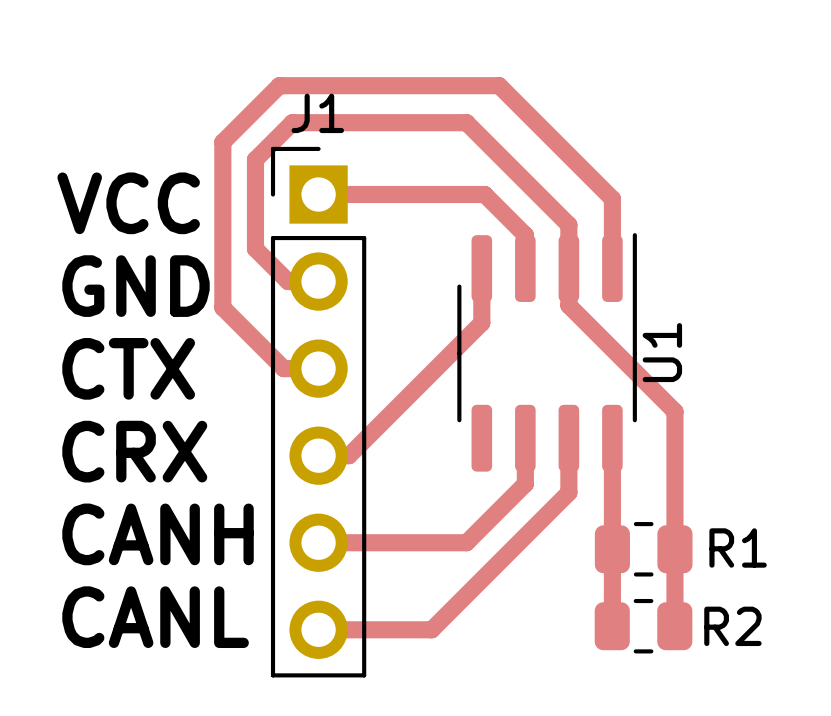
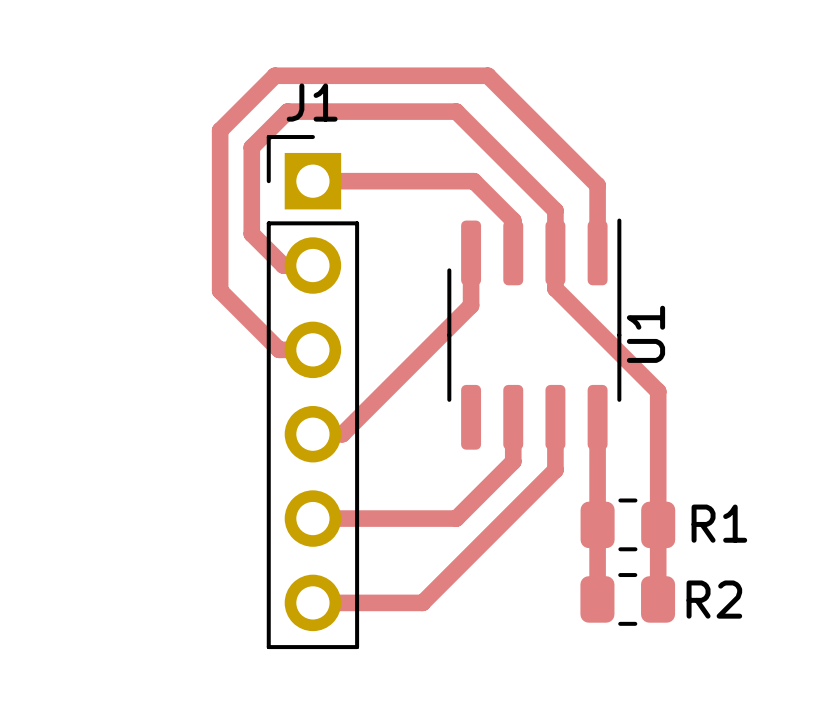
text: VCC (128, 203) -> none
text: GND (136, 286) -> none
text: CTX (128, 368) -> none
text: CRX (134, 451) -> none
text: CANH (158, 534) -> none
text: CANL (155, 617) -> none

